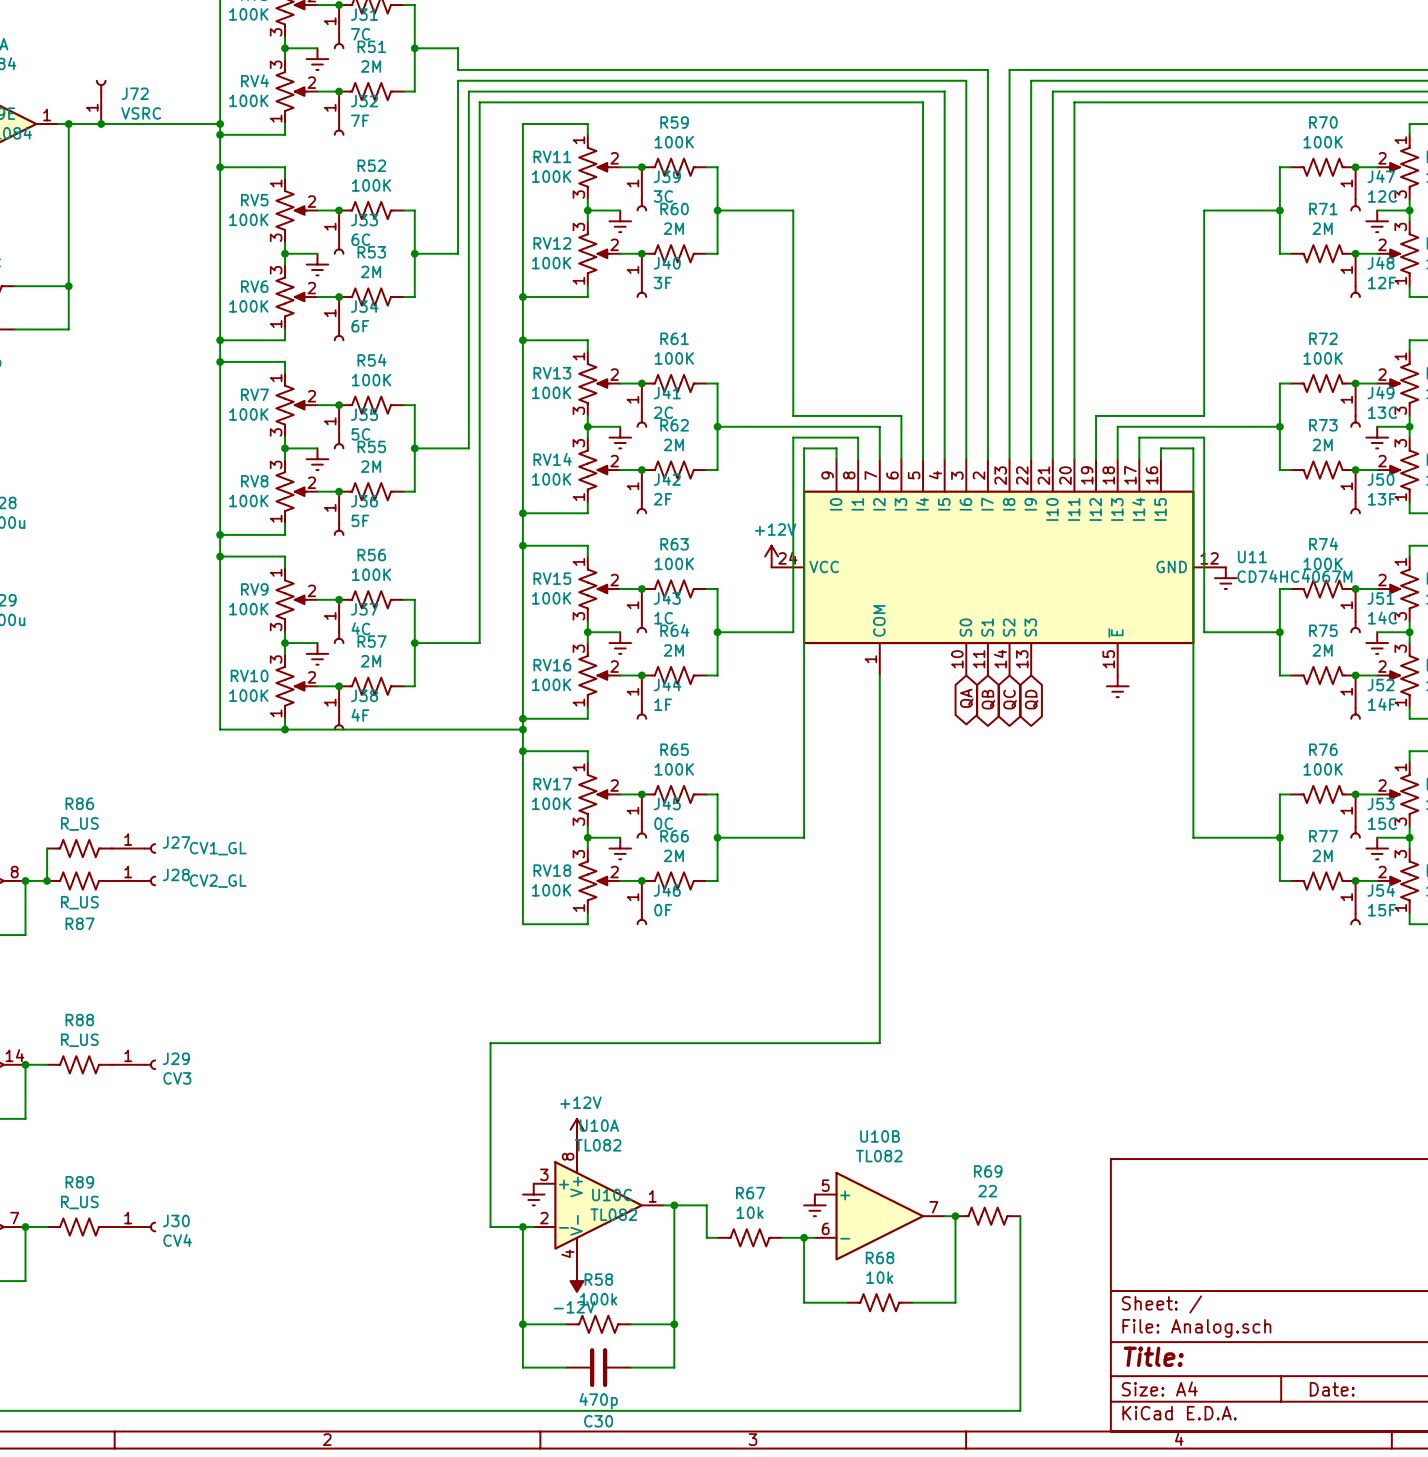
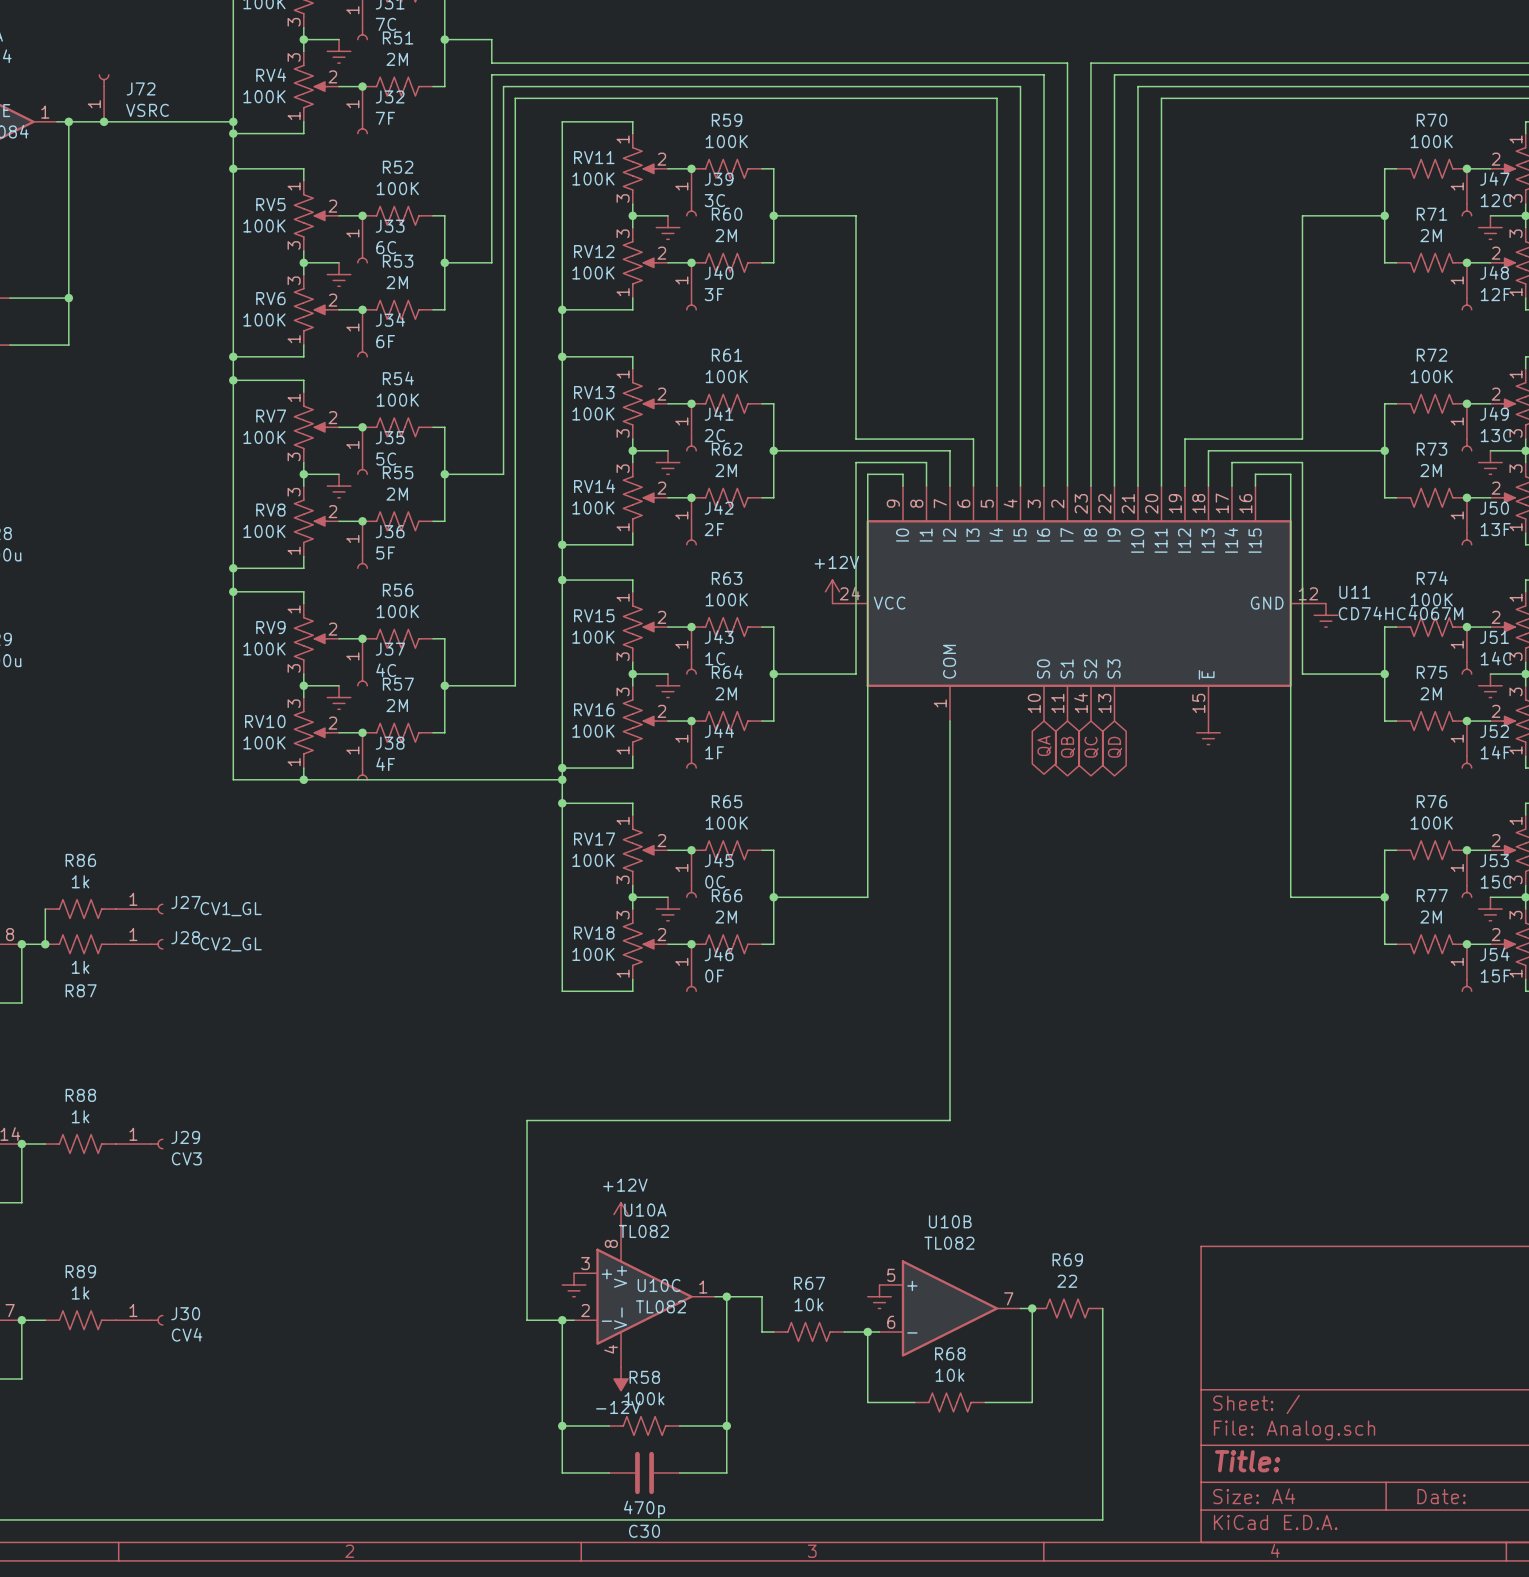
R86 value: R_US (79, 823) -> 1k (80, 881)
R87 value: R_US (79, 902) -> 1k (80, 967)
R88 value: R_US (79, 1040) -> 1k (80, 1116)
R89 value: R_US (79, 1202) -> 1k (80, 1293)

